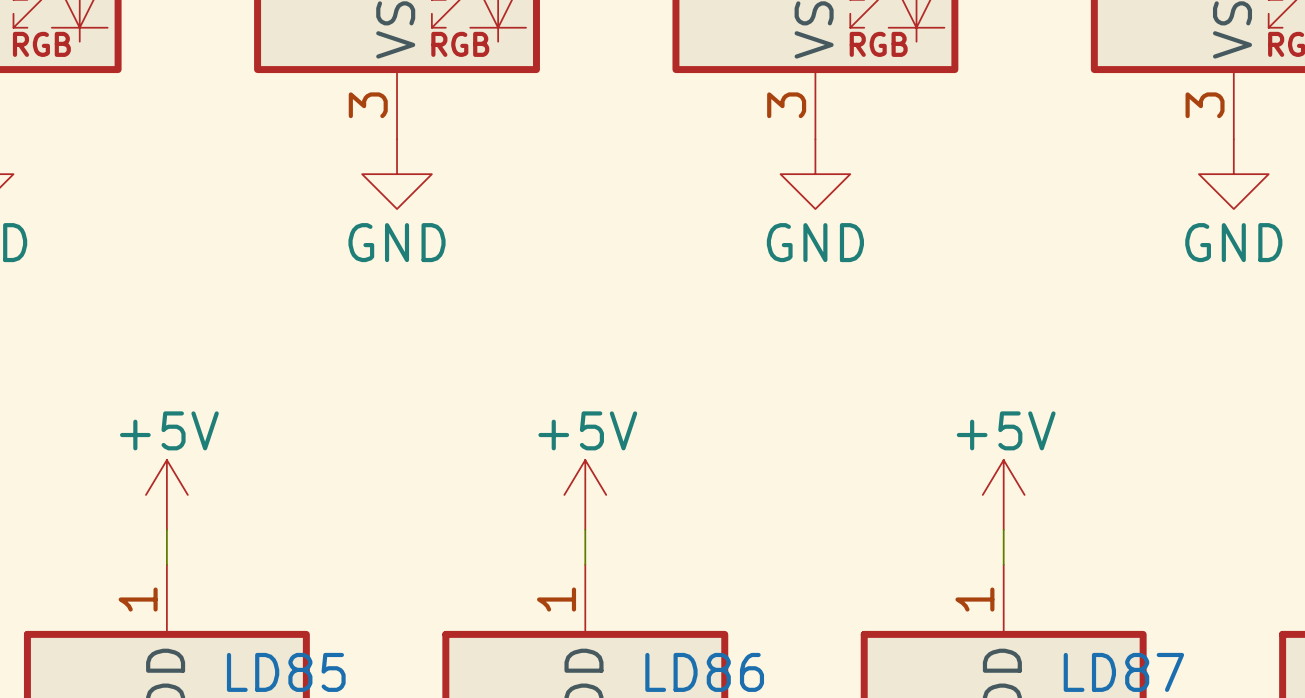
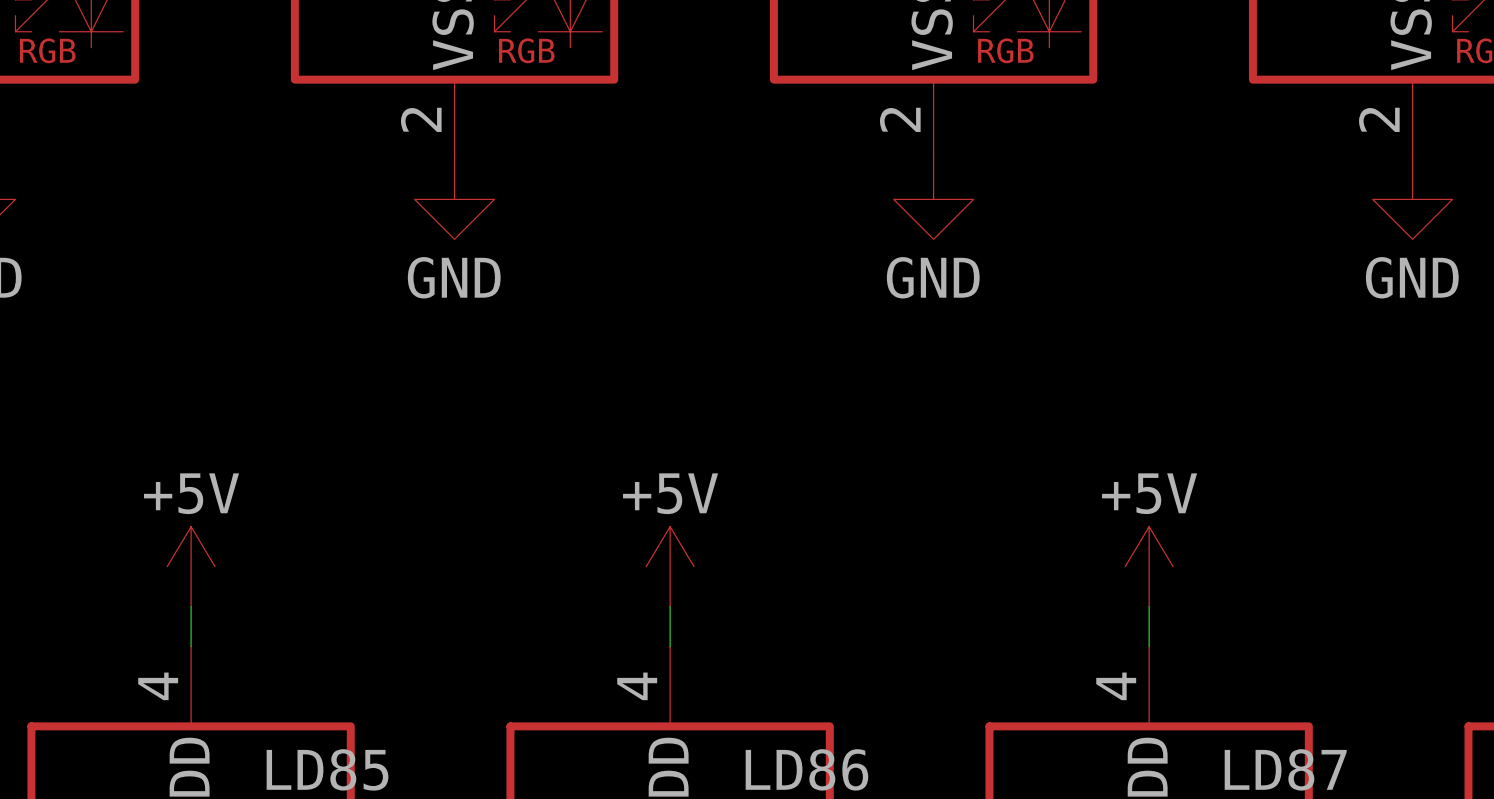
part pin number: 3 (368, 105) -> 2 (421, 119)
part pin number: 3 (786, 105) -> 2 (900, 119)
part pin number: 3 (1205, 105) -> 2 (1379, 119)
part pin number: 1 (138, 599) -> 4 (158, 686)
LD85 pin number: 1 (556, 599) -> 4 (637, 686)
LD86 pin number: 1 (974, 599) -> 4 (1116, 686)

